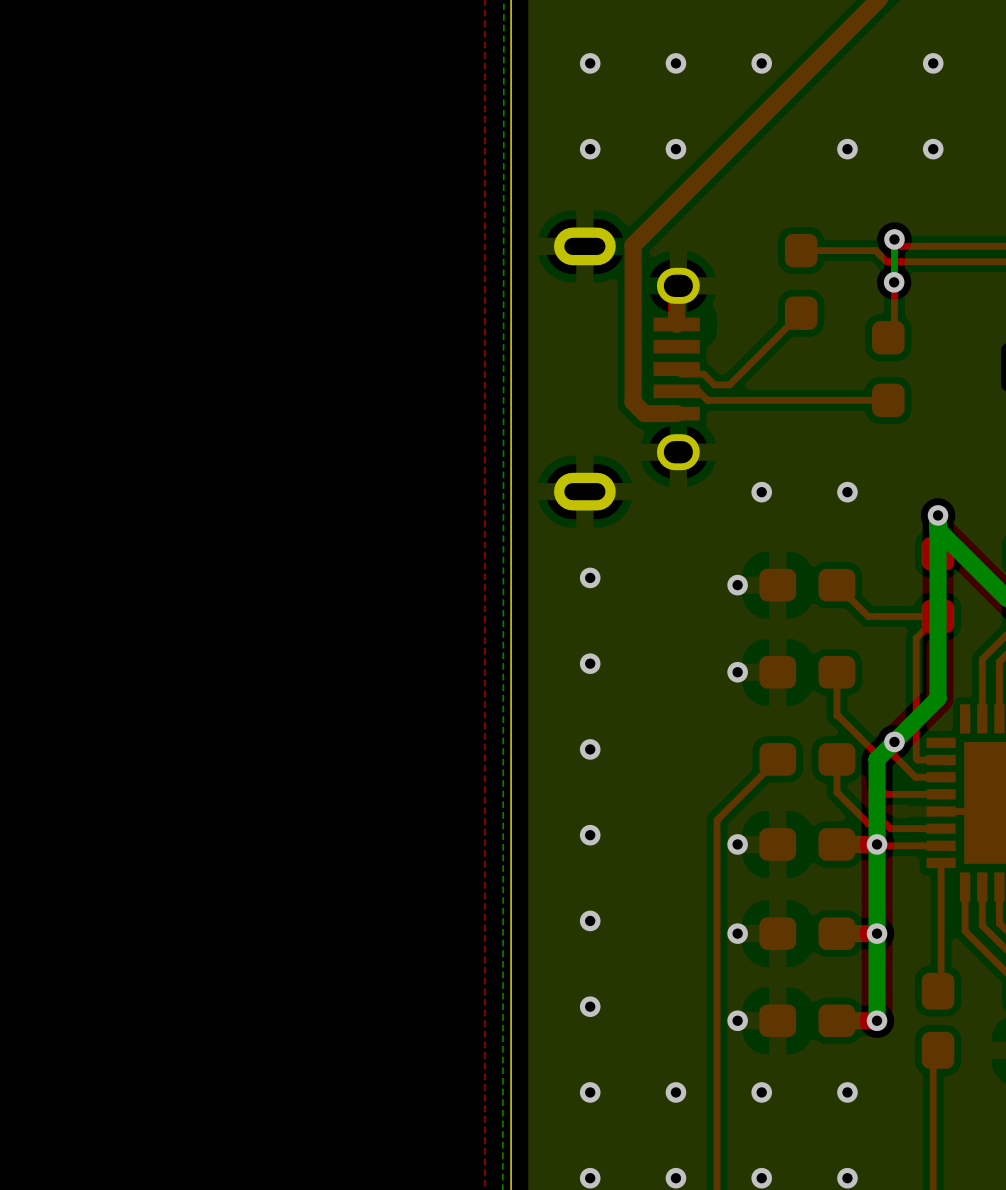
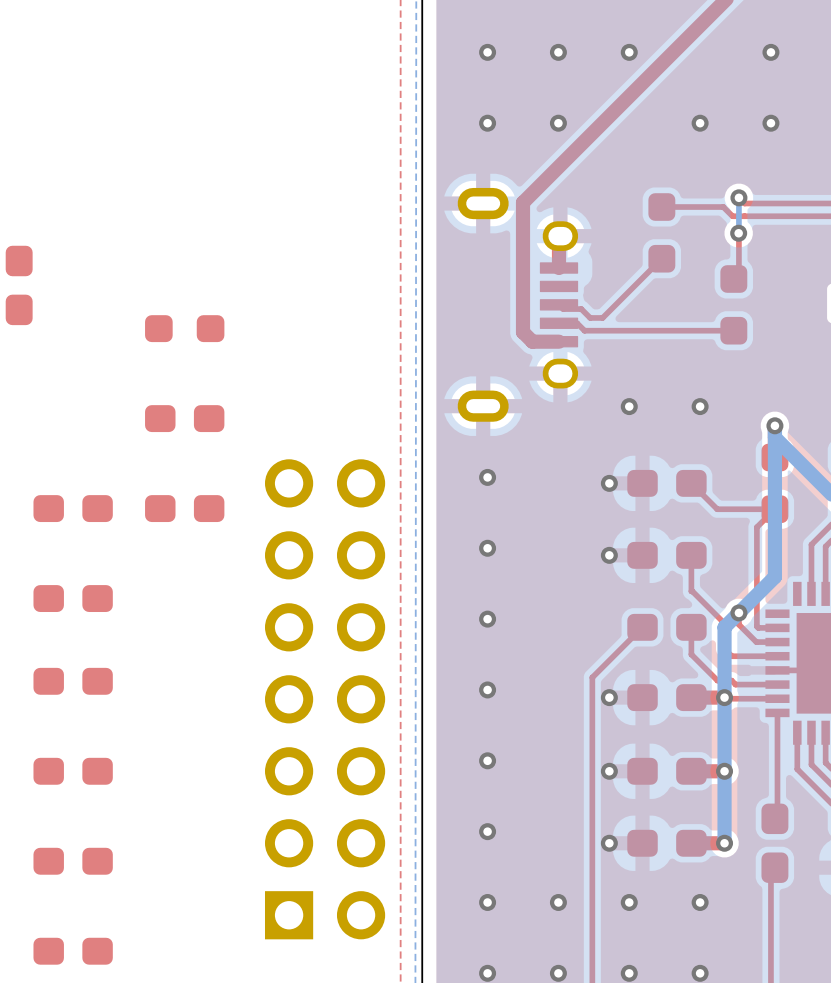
part: none -> (19, 285)
part: none -> (184, 328)
part: none -> (184, 418)
part: none -> (73, 508)
part: none -> (184, 508)
part: none -> (73, 598)
part: none -> (73, 681)
part: none -> (325, 699)
part: none -> (73, 771)
part: none -> (73, 861)
part: none -> (73, 951)

